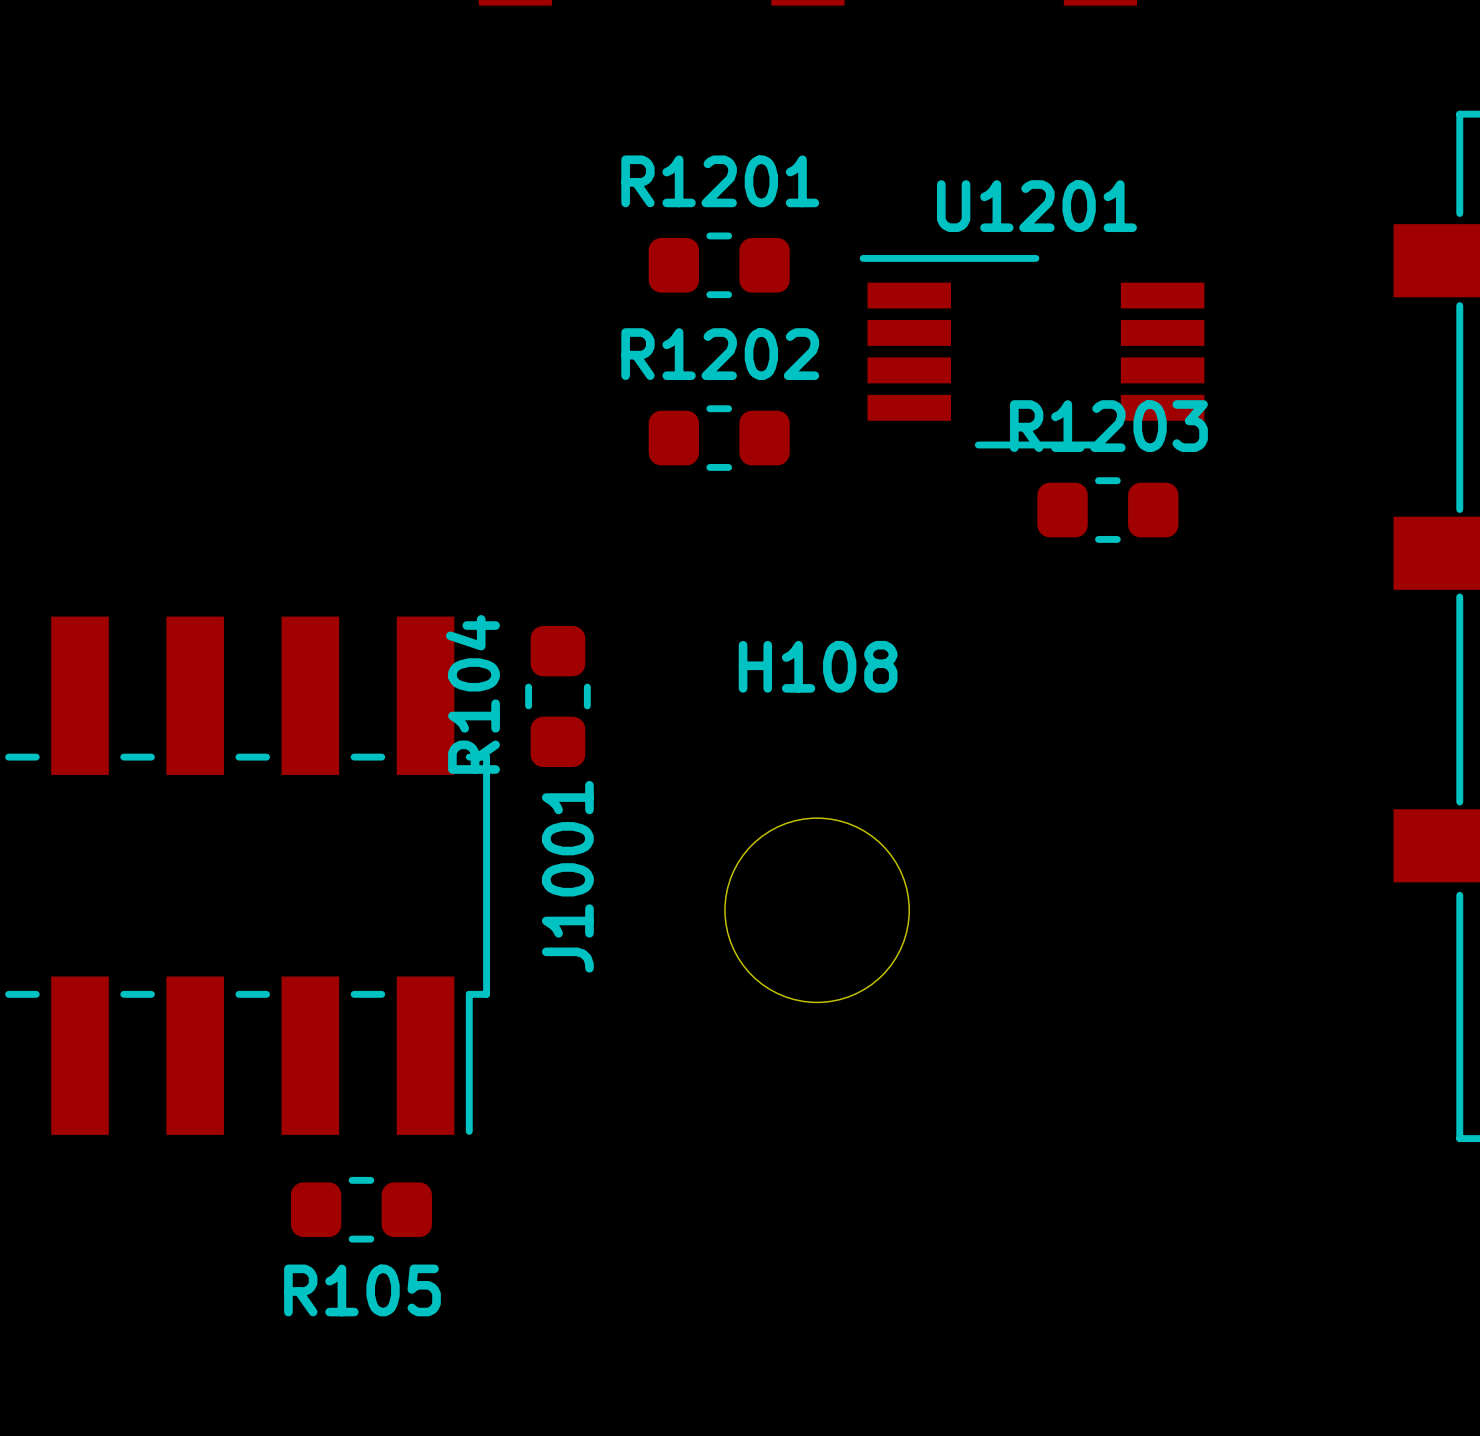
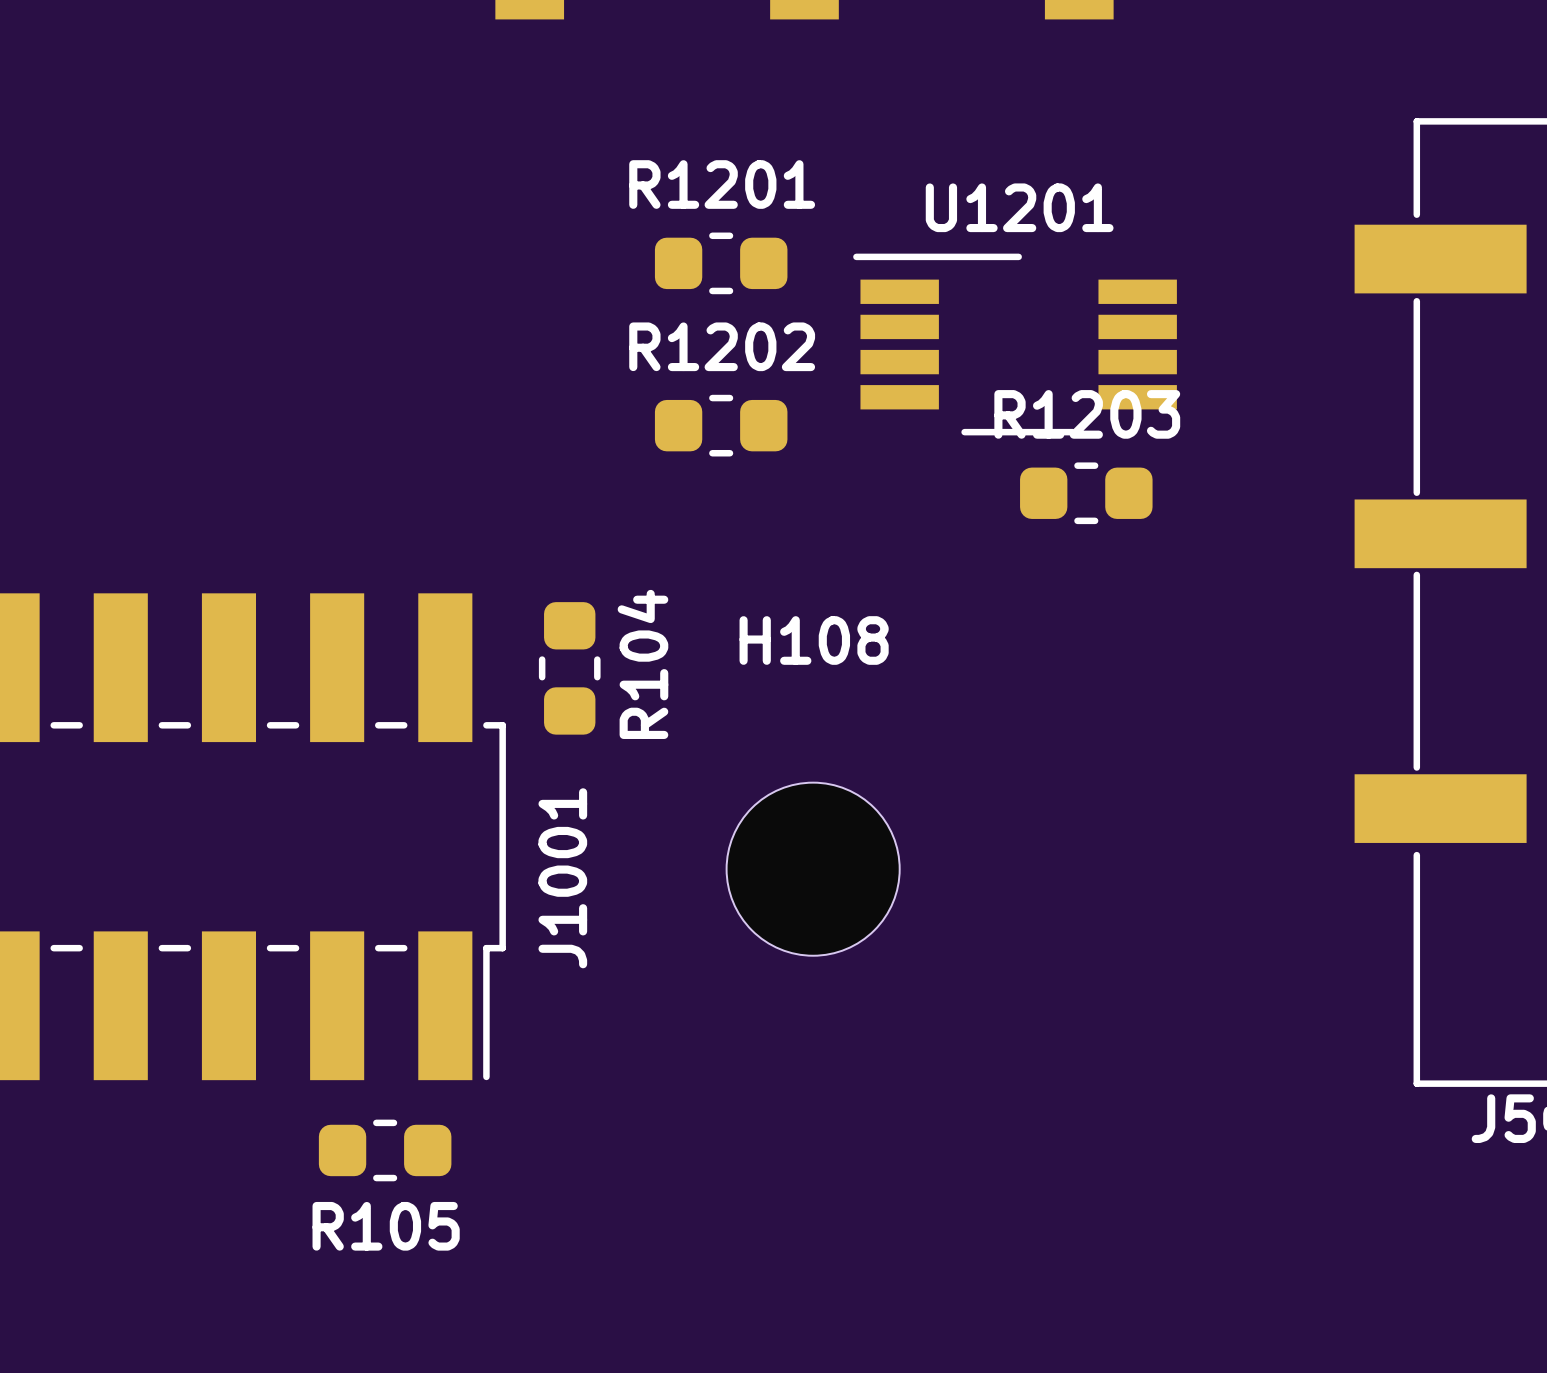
R104 name position: R104 (472, 694) -> R104 (642, 664)
J1001 name position: J1001 (567, 876) -> J1001 (562, 878)

